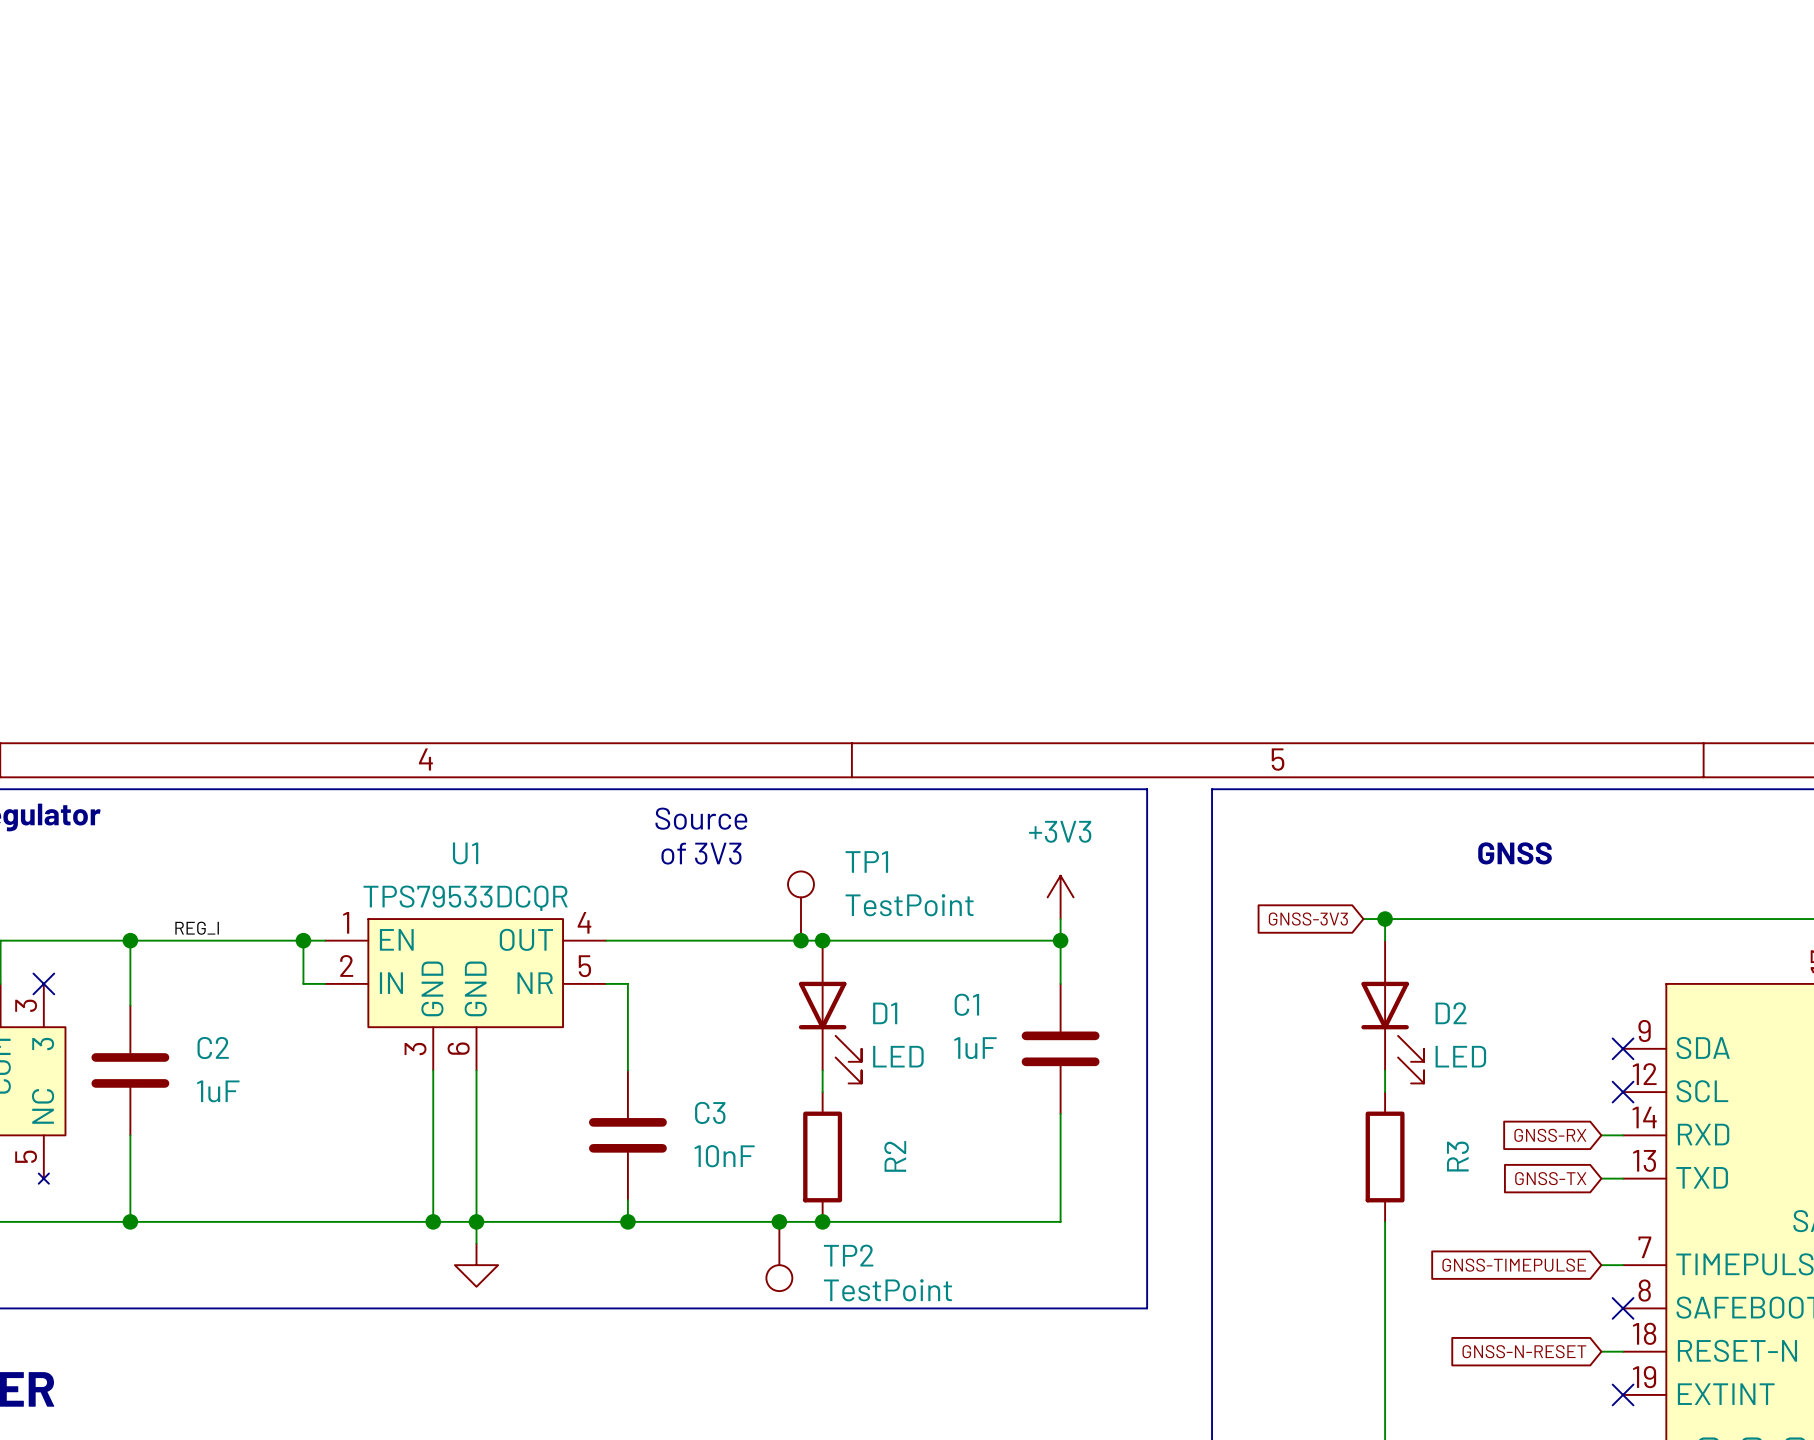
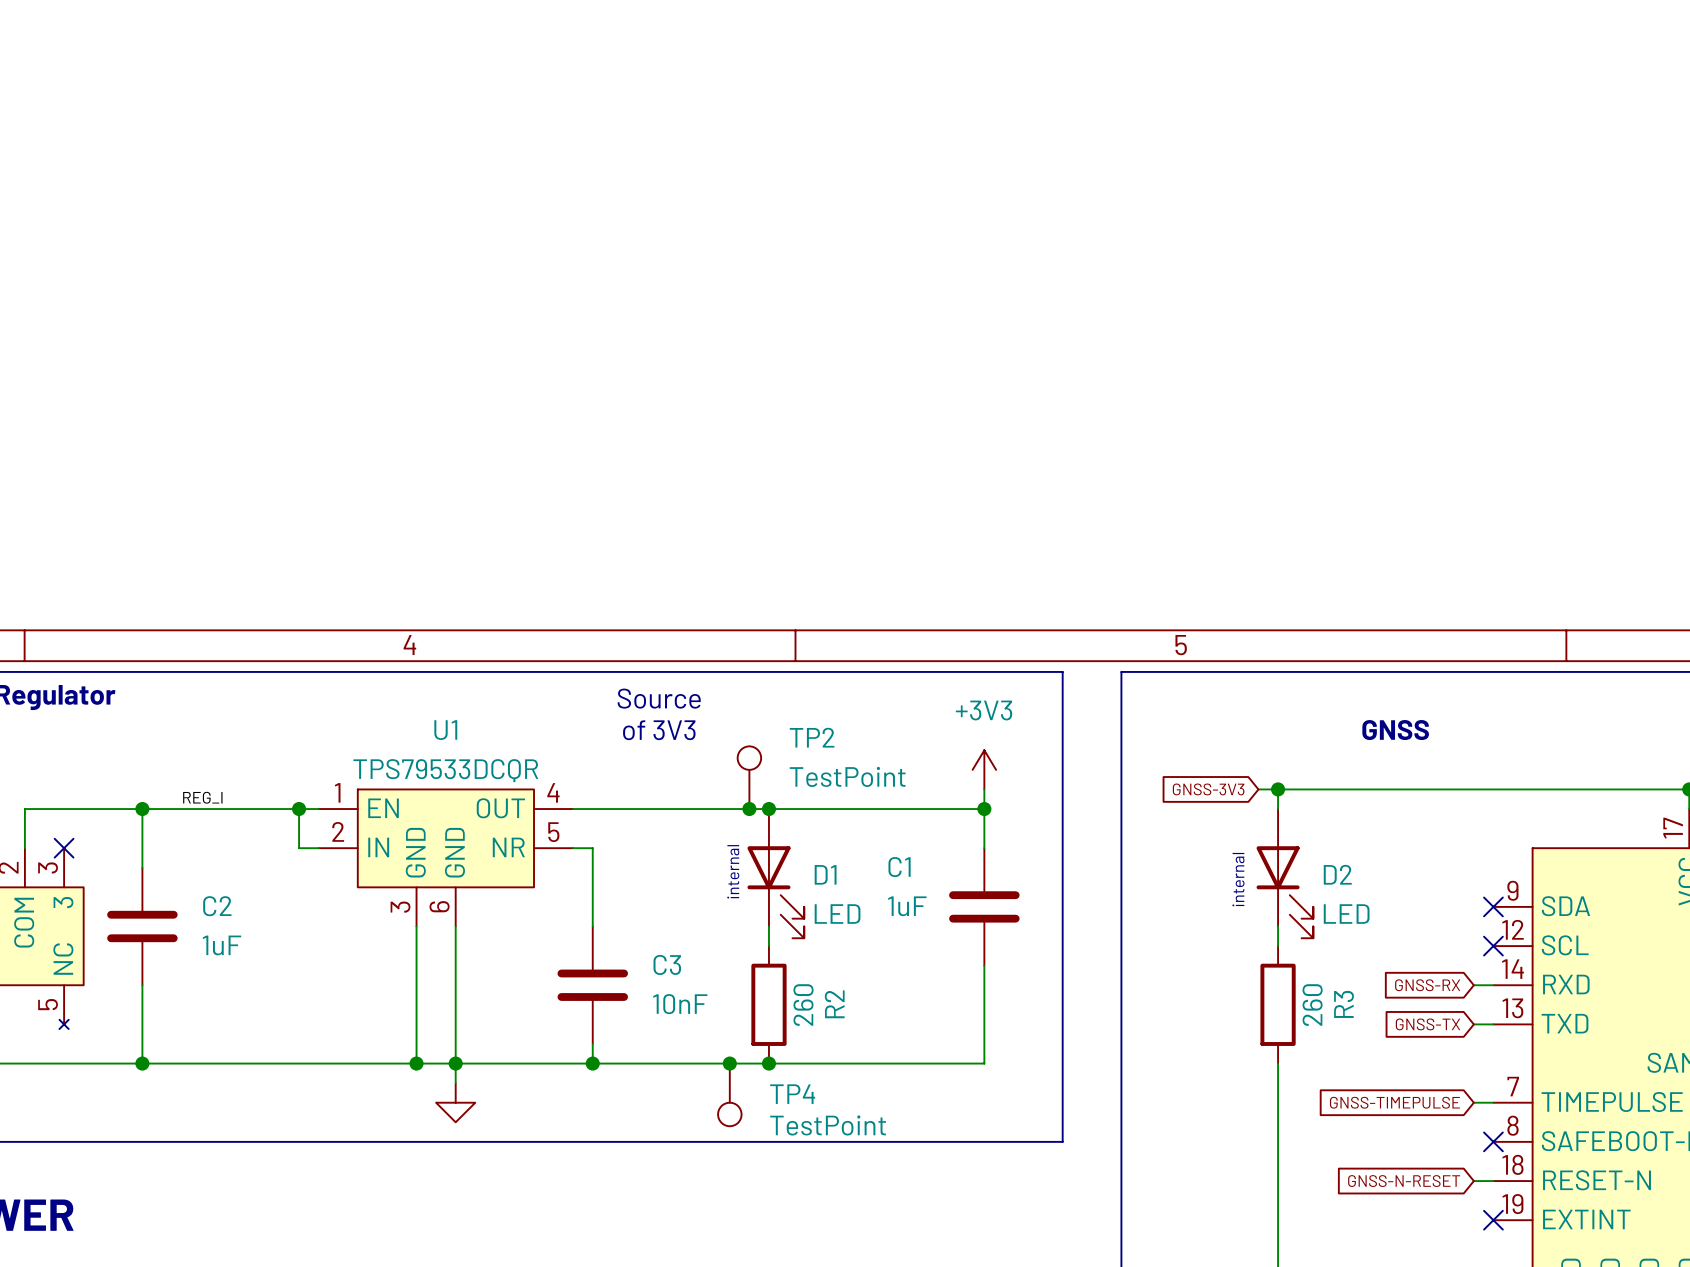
TP1 name: TP1 (866, 861) -> TP2 (812, 737)
text: none -> internal (733, 871)
text: none -> internal (1238, 879)
R2 value: none -> 260 (803, 1005)
R3 value: none -> 260 (1312, 1005)
TP2 name: TP2 (848, 1255) -> TP4 (792, 1094)

